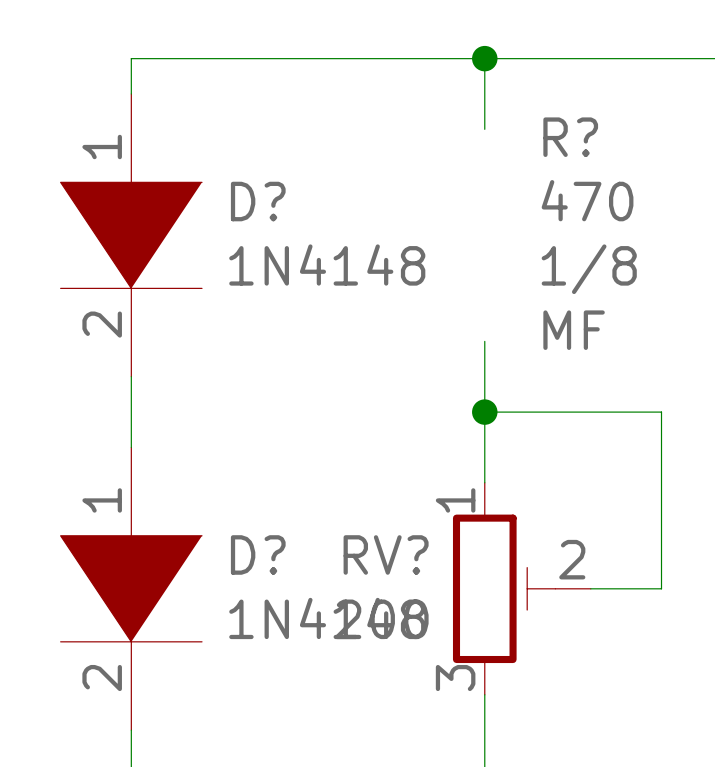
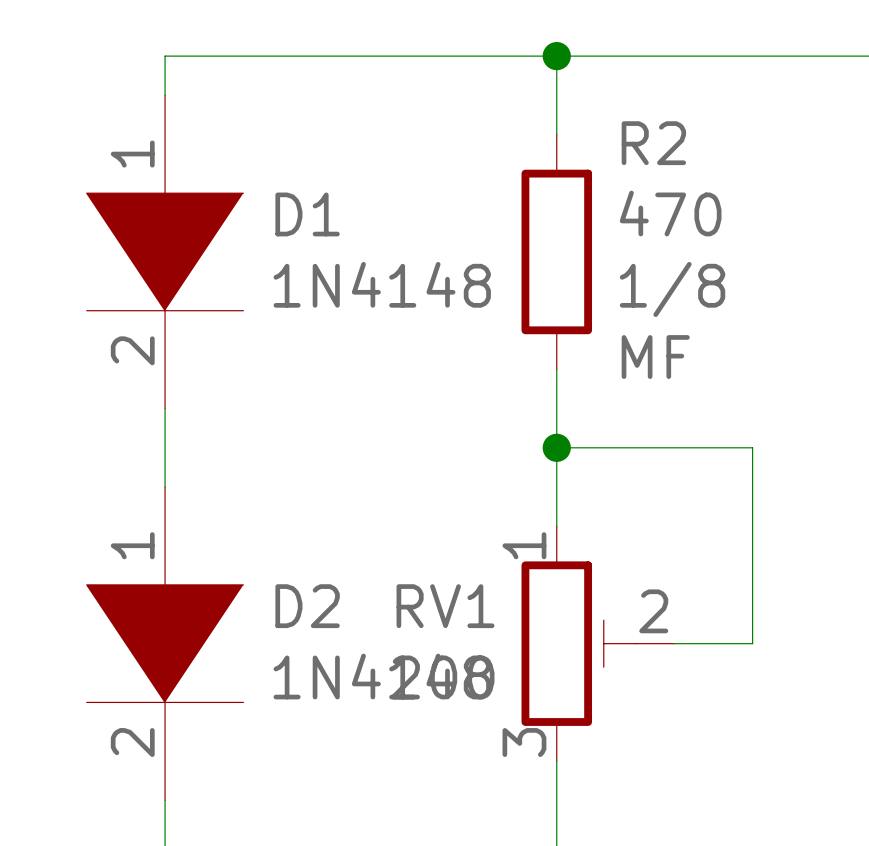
D? name: D? (258, 201) -> D1 (307, 214)
R?: 470 (589, 233) -> none
R2: none -> 470 (556, 251)
D? name: D? (258, 554) -> D2 (307, 606)
RV? name: RV? (386, 554) -> RV1 (445, 606)

